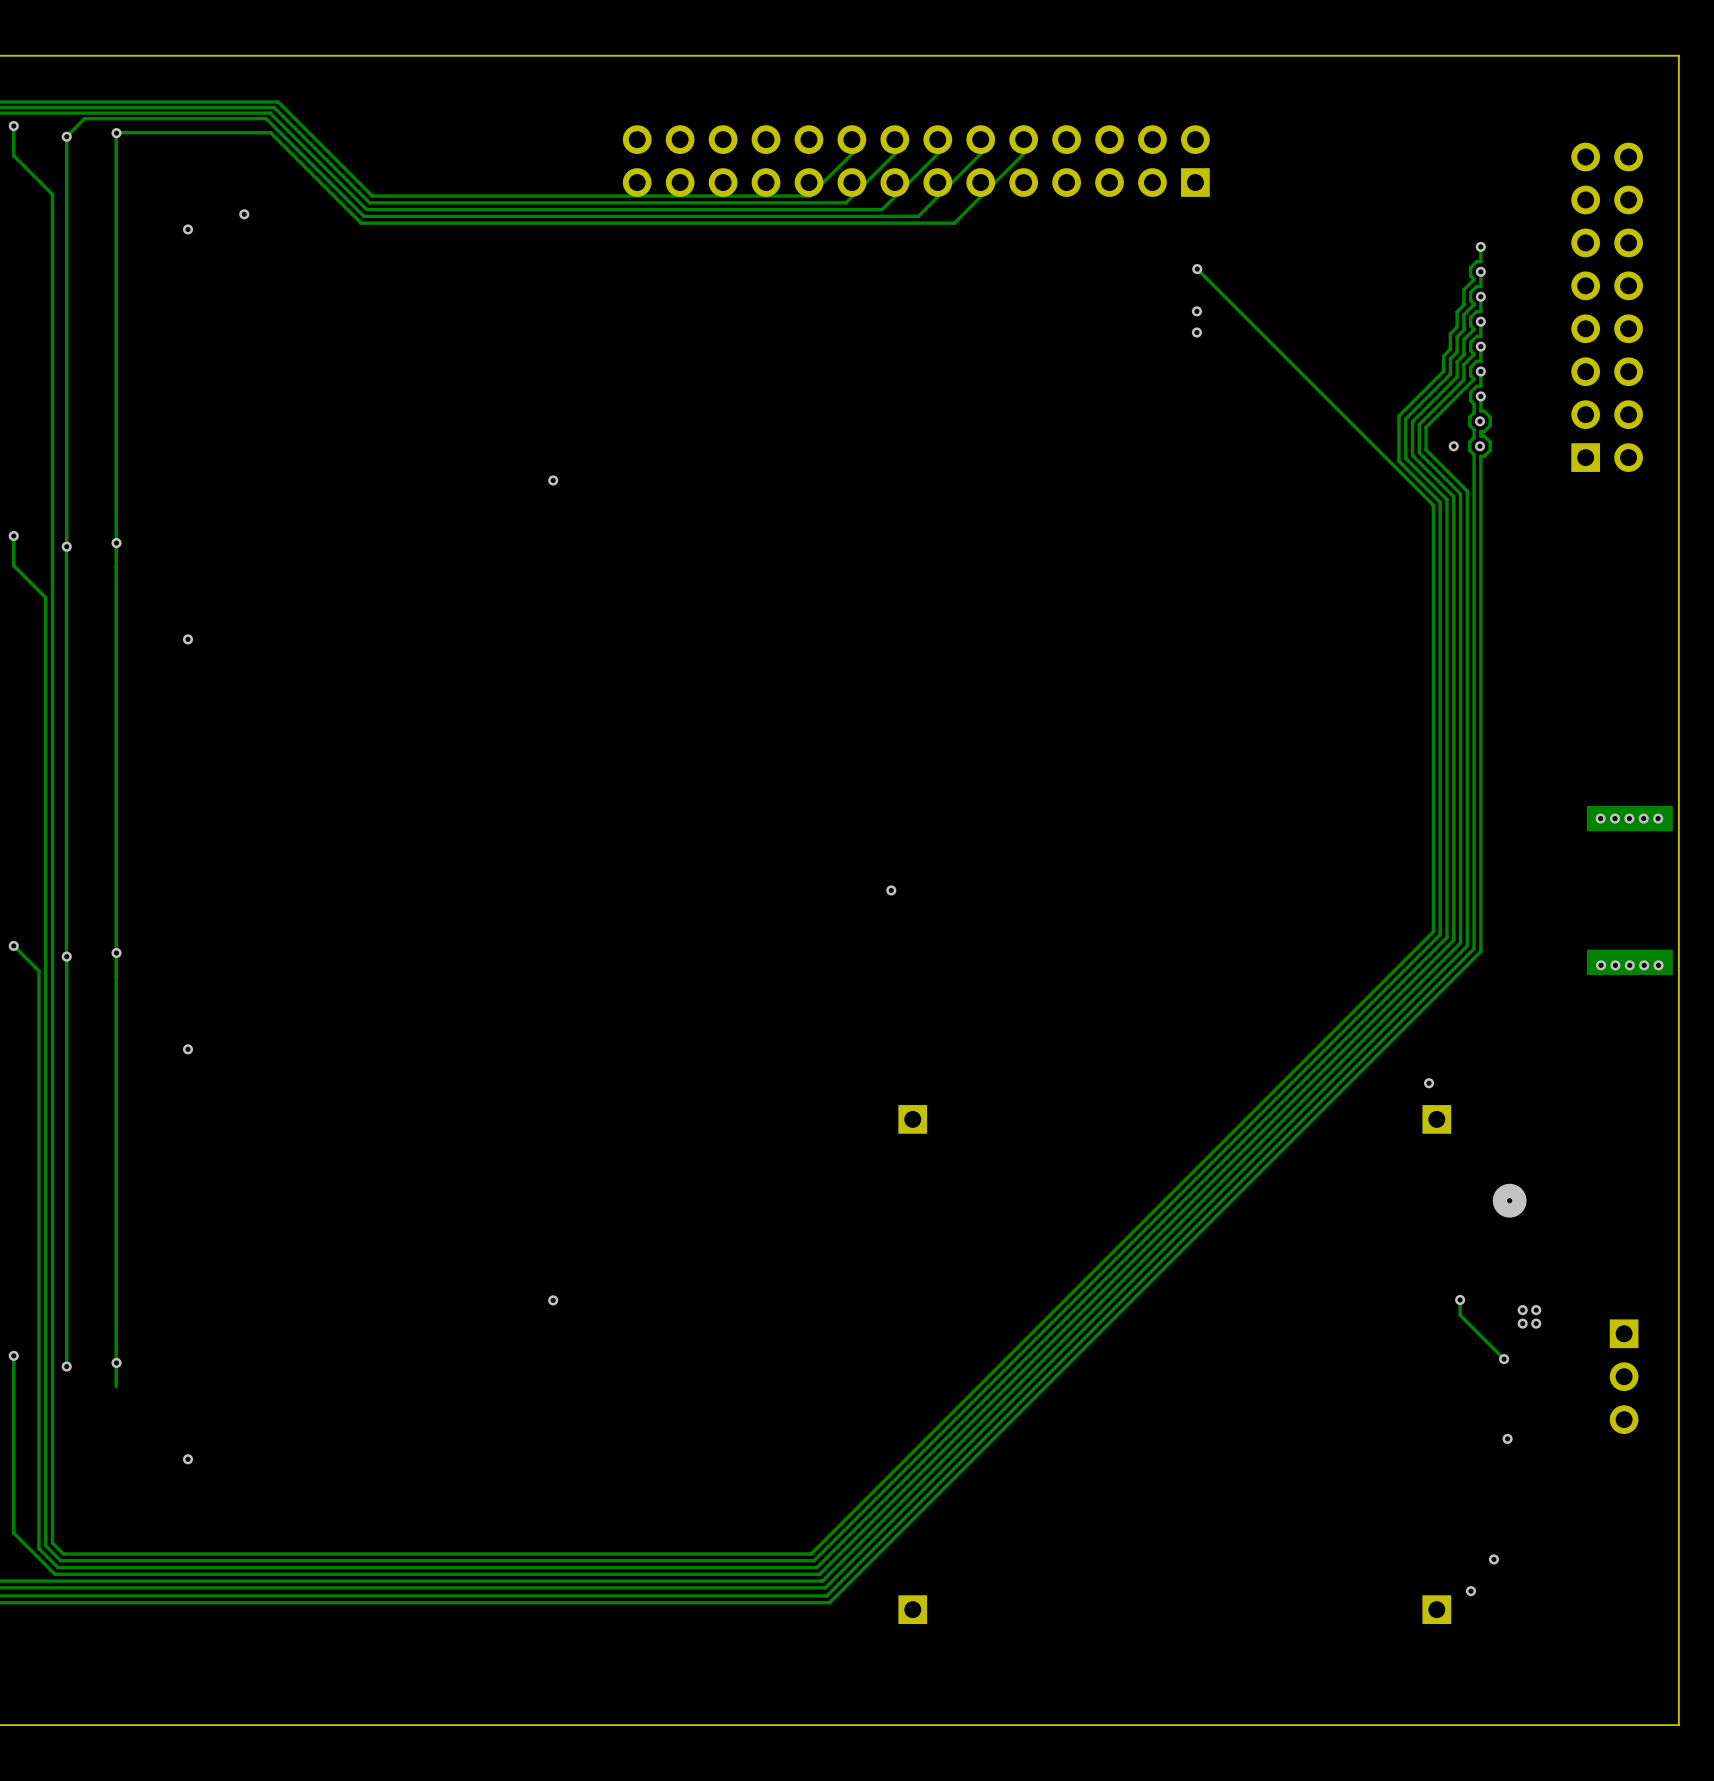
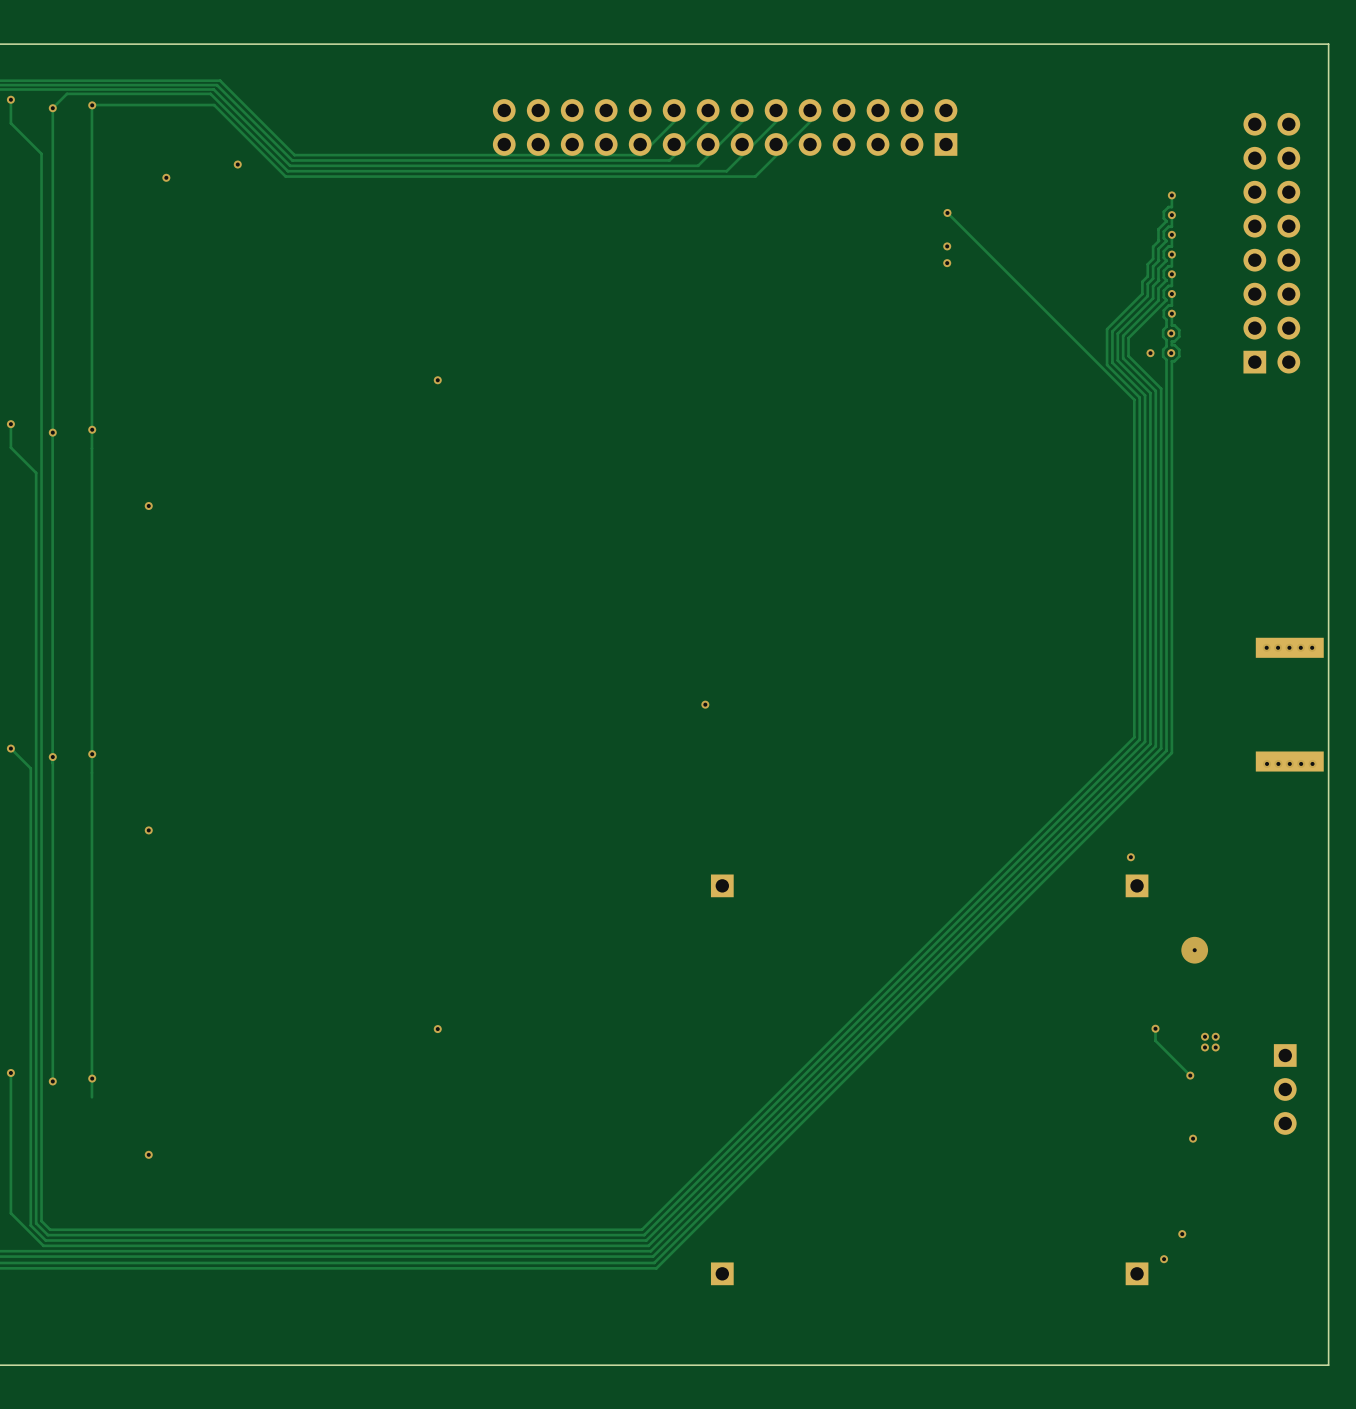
via: none -> (237, 164)
via: (244, 214) -> none
via: none -> (166, 177)
via: (187, 229) -> none

